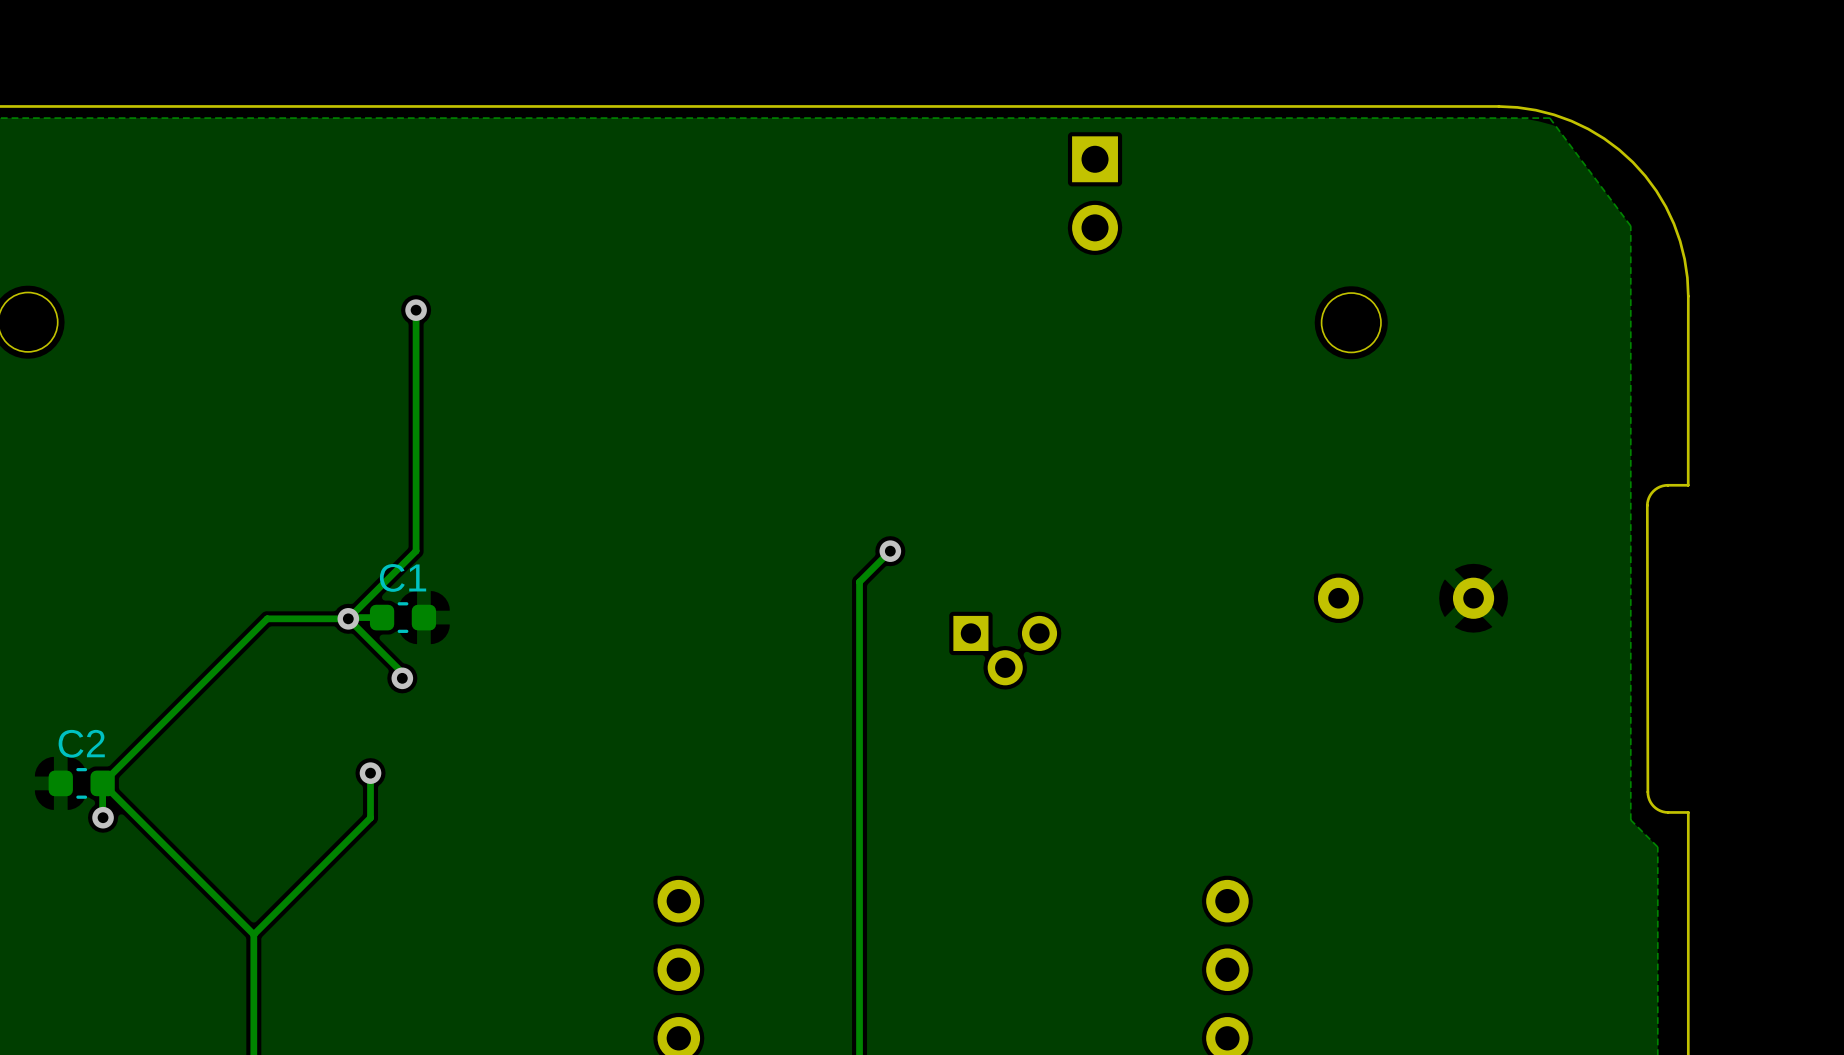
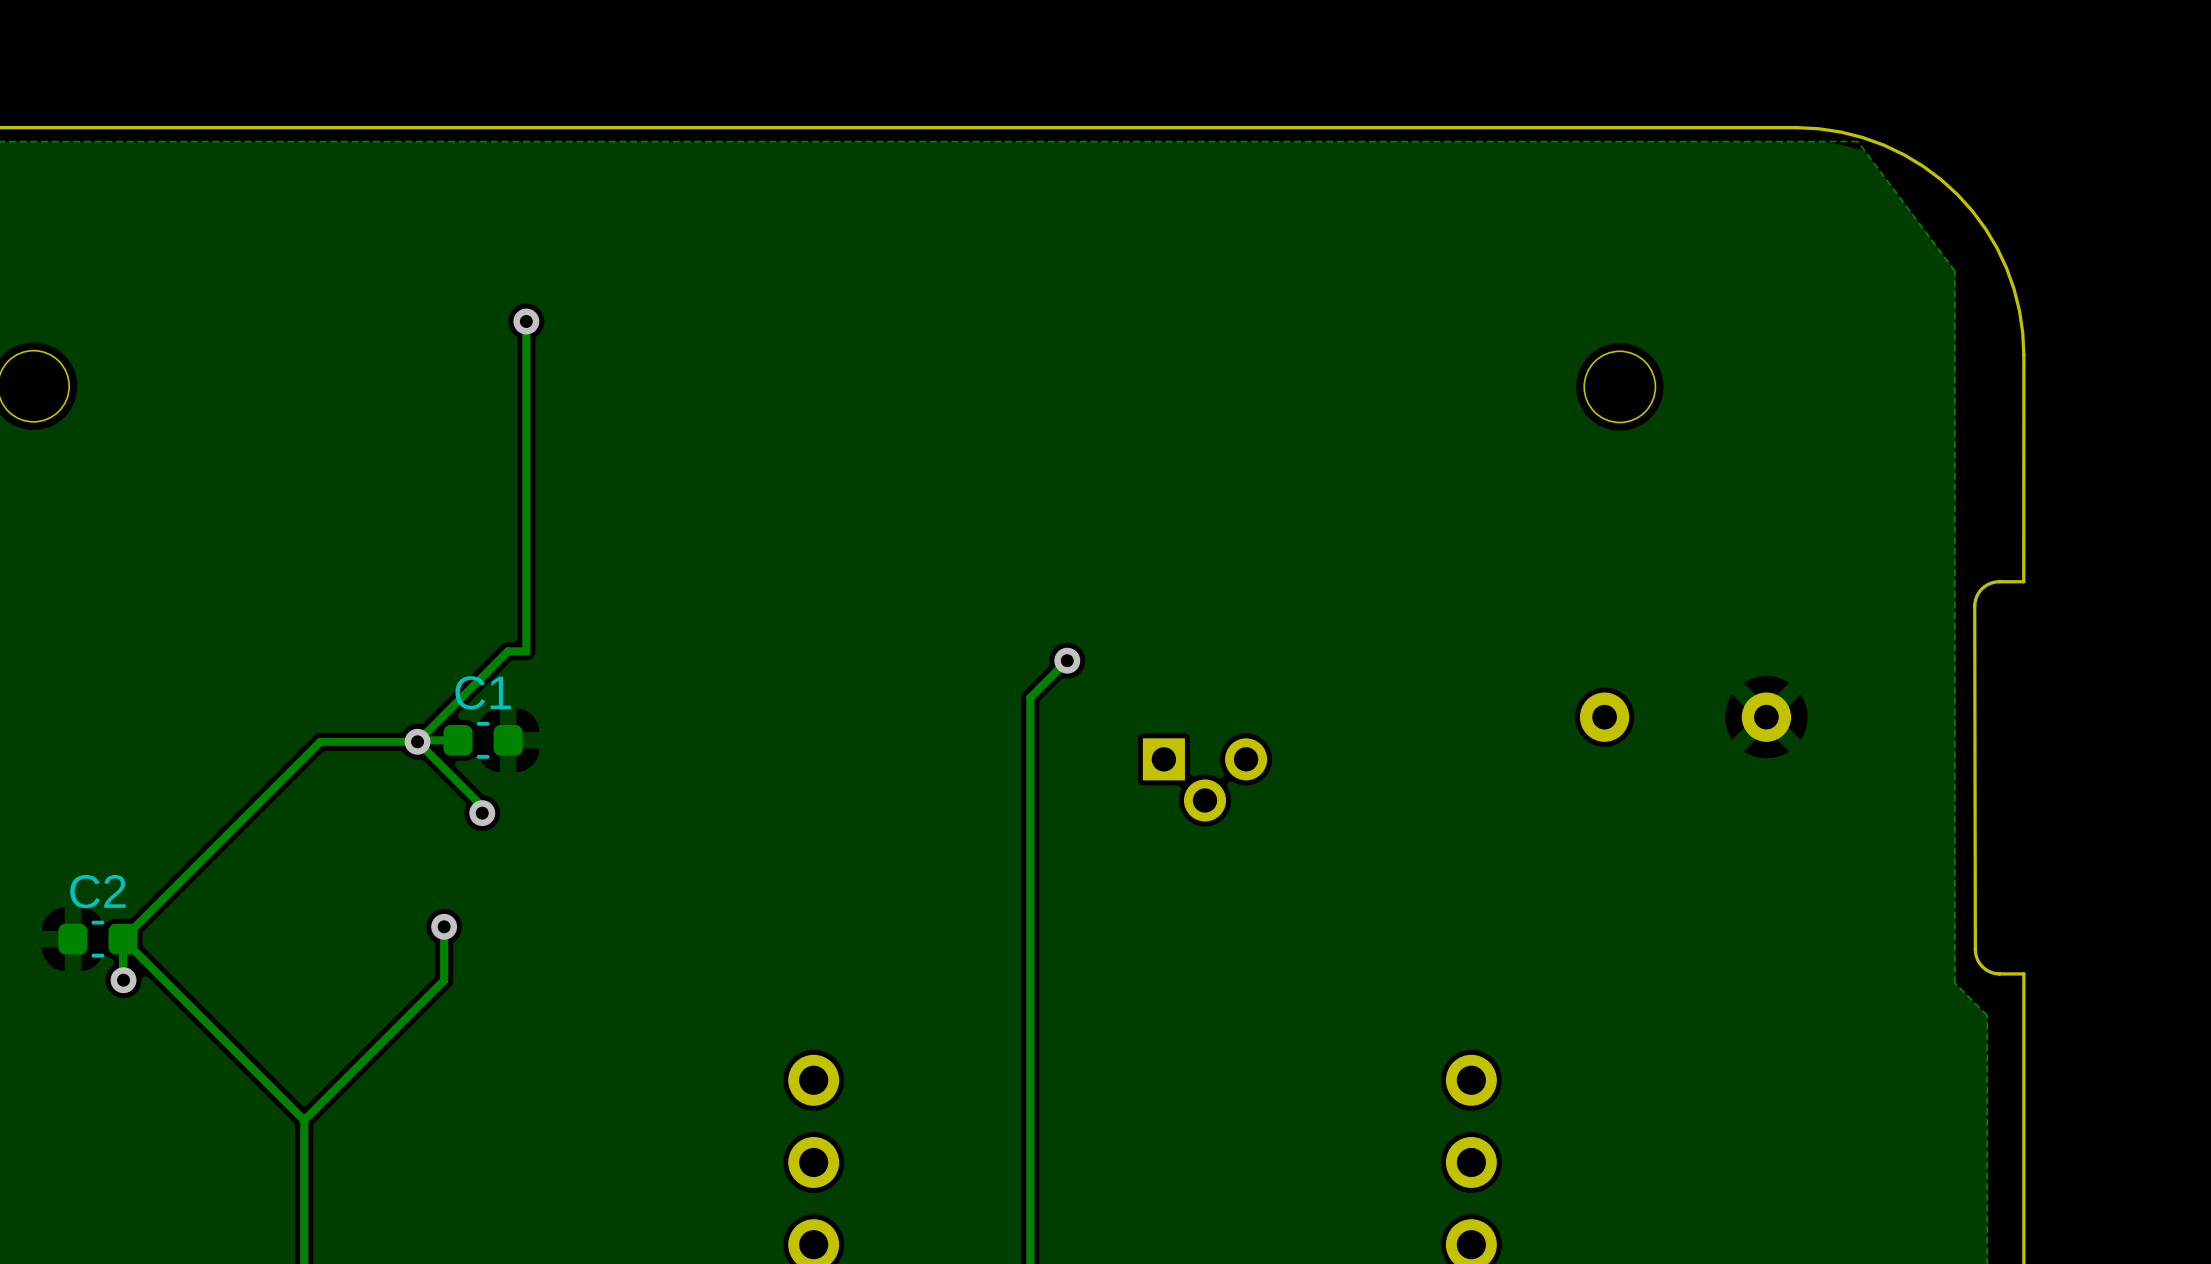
part: (1095, 193) -> none
track: (416, 310) (416, 551) -> (526, 321) (526, 651) (507, 651) (498, 660)
via position: (416, 310) -> (526, 321)

